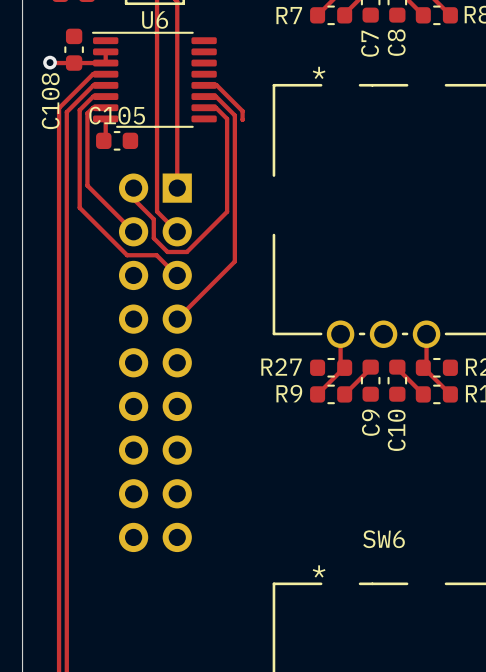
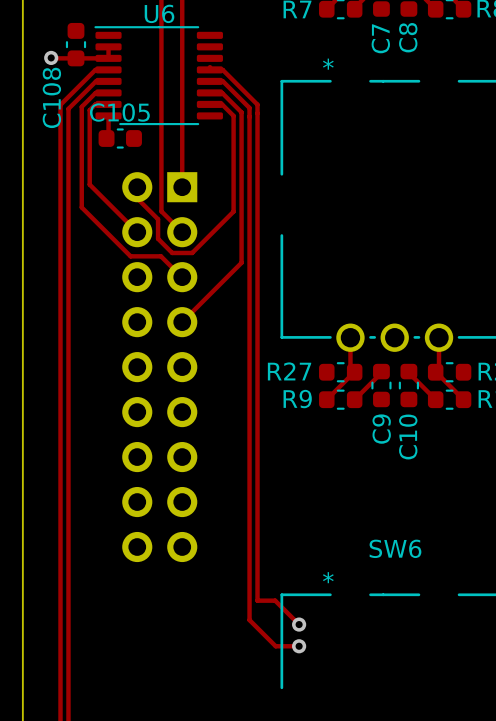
track: none -> (209, 69) (222, 69) (257, 104) (257, 600) (275, 600) (299, 624)
track: none -> (249, 116) (249, 620) (275, 646) (299, 646)
via: none -> (299, 624)
via: none -> (299, 646)

